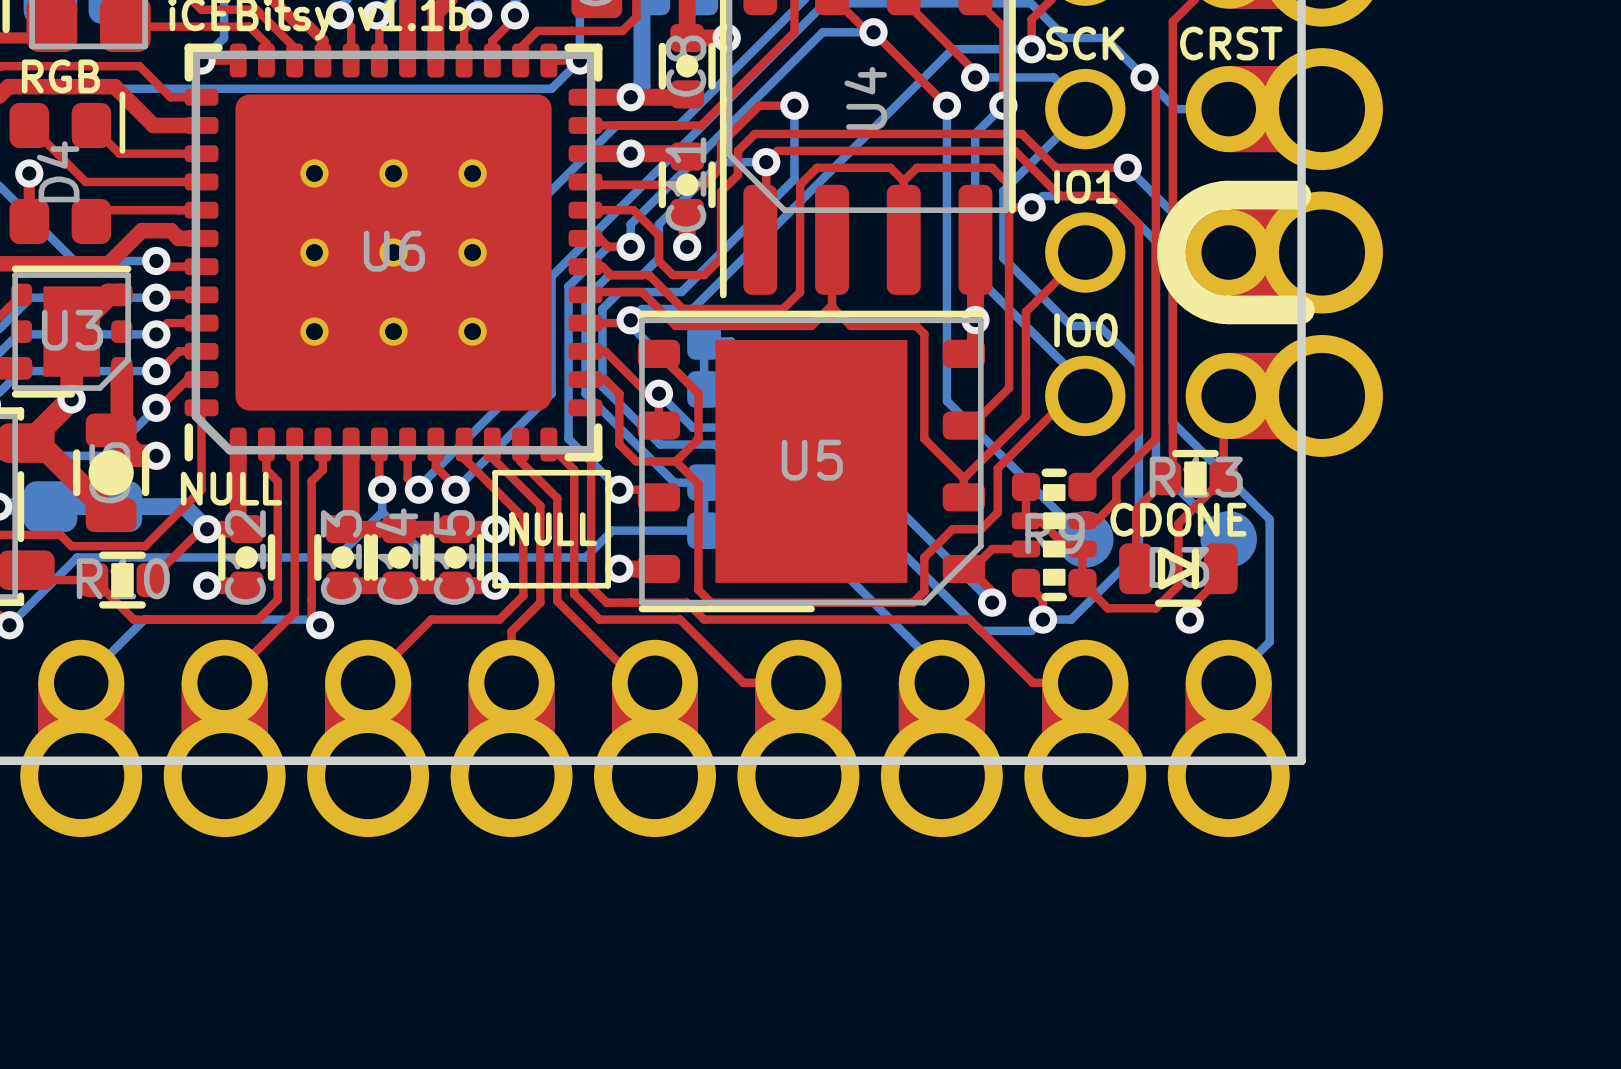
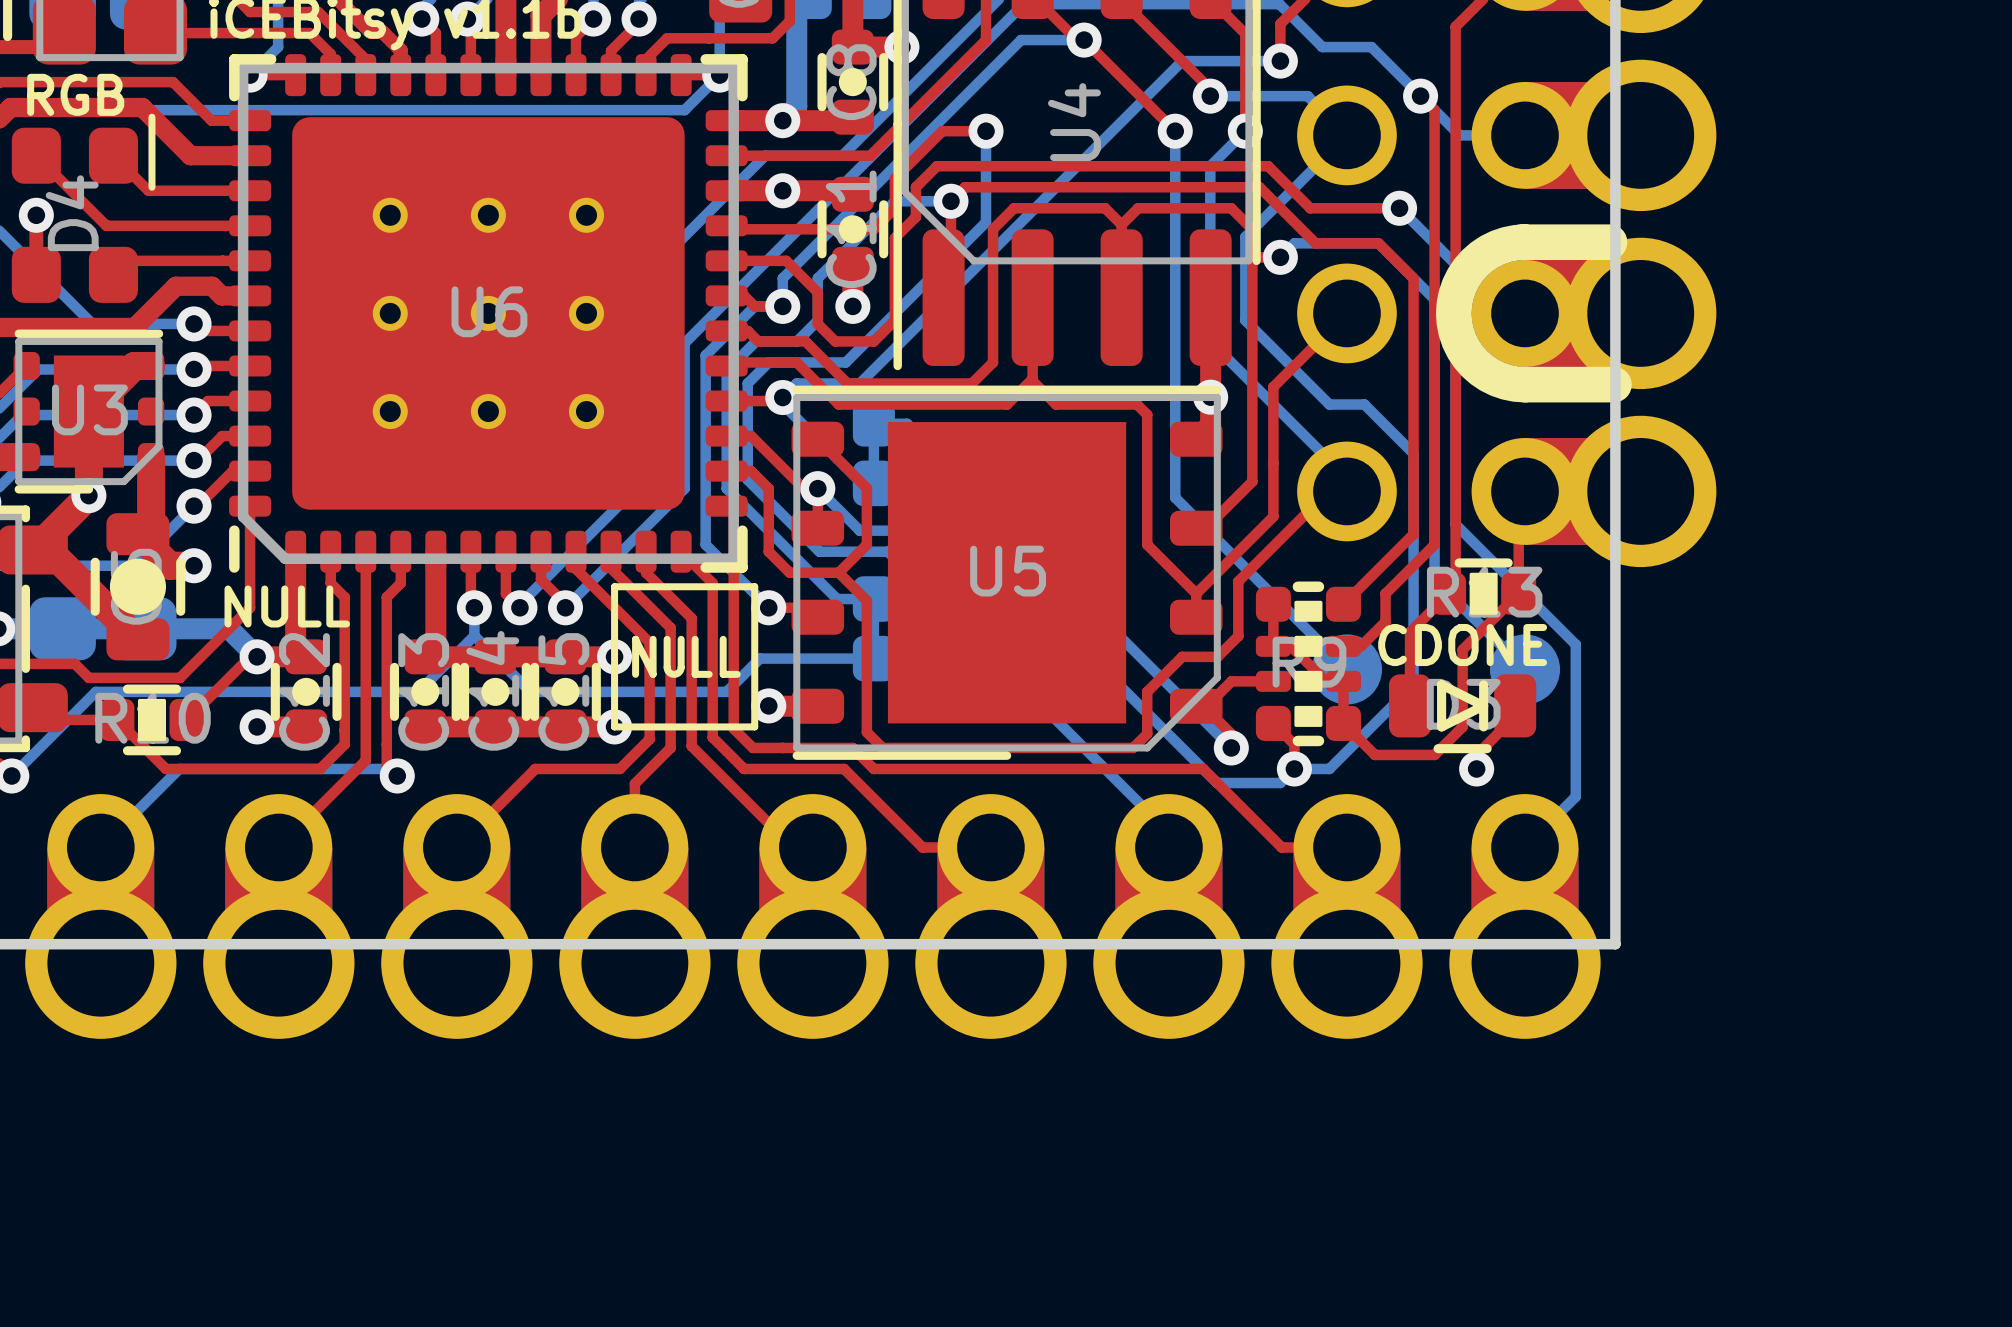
text: SCK (1085, 43) -> none
text: CRST (1231, 43) -> none
text: IO1 (1085, 186) -> none
text: IO0 (1085, 330) -> none

